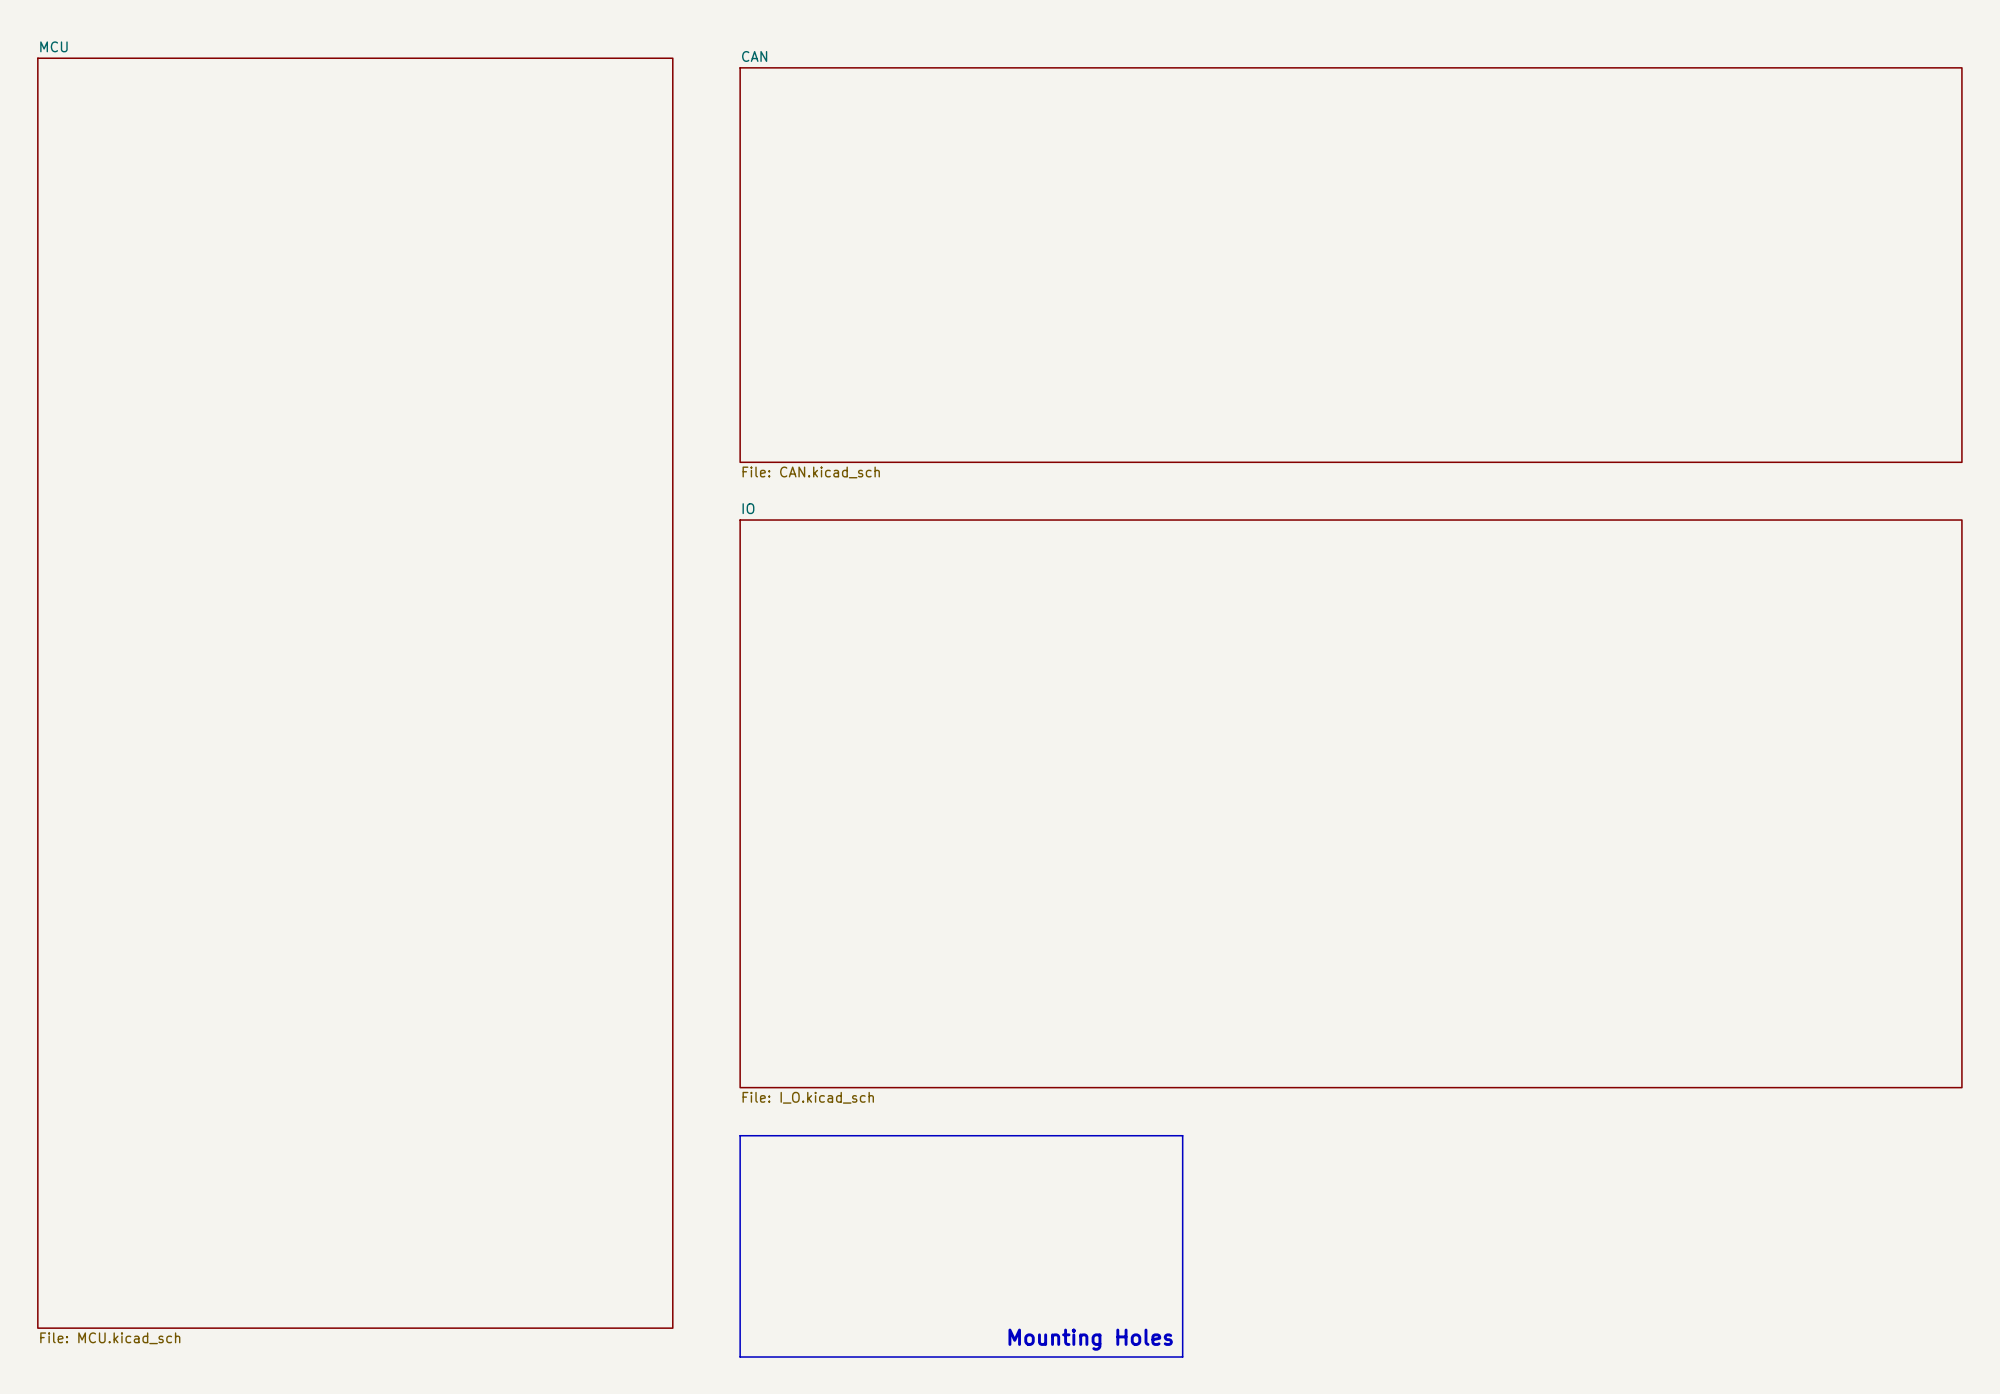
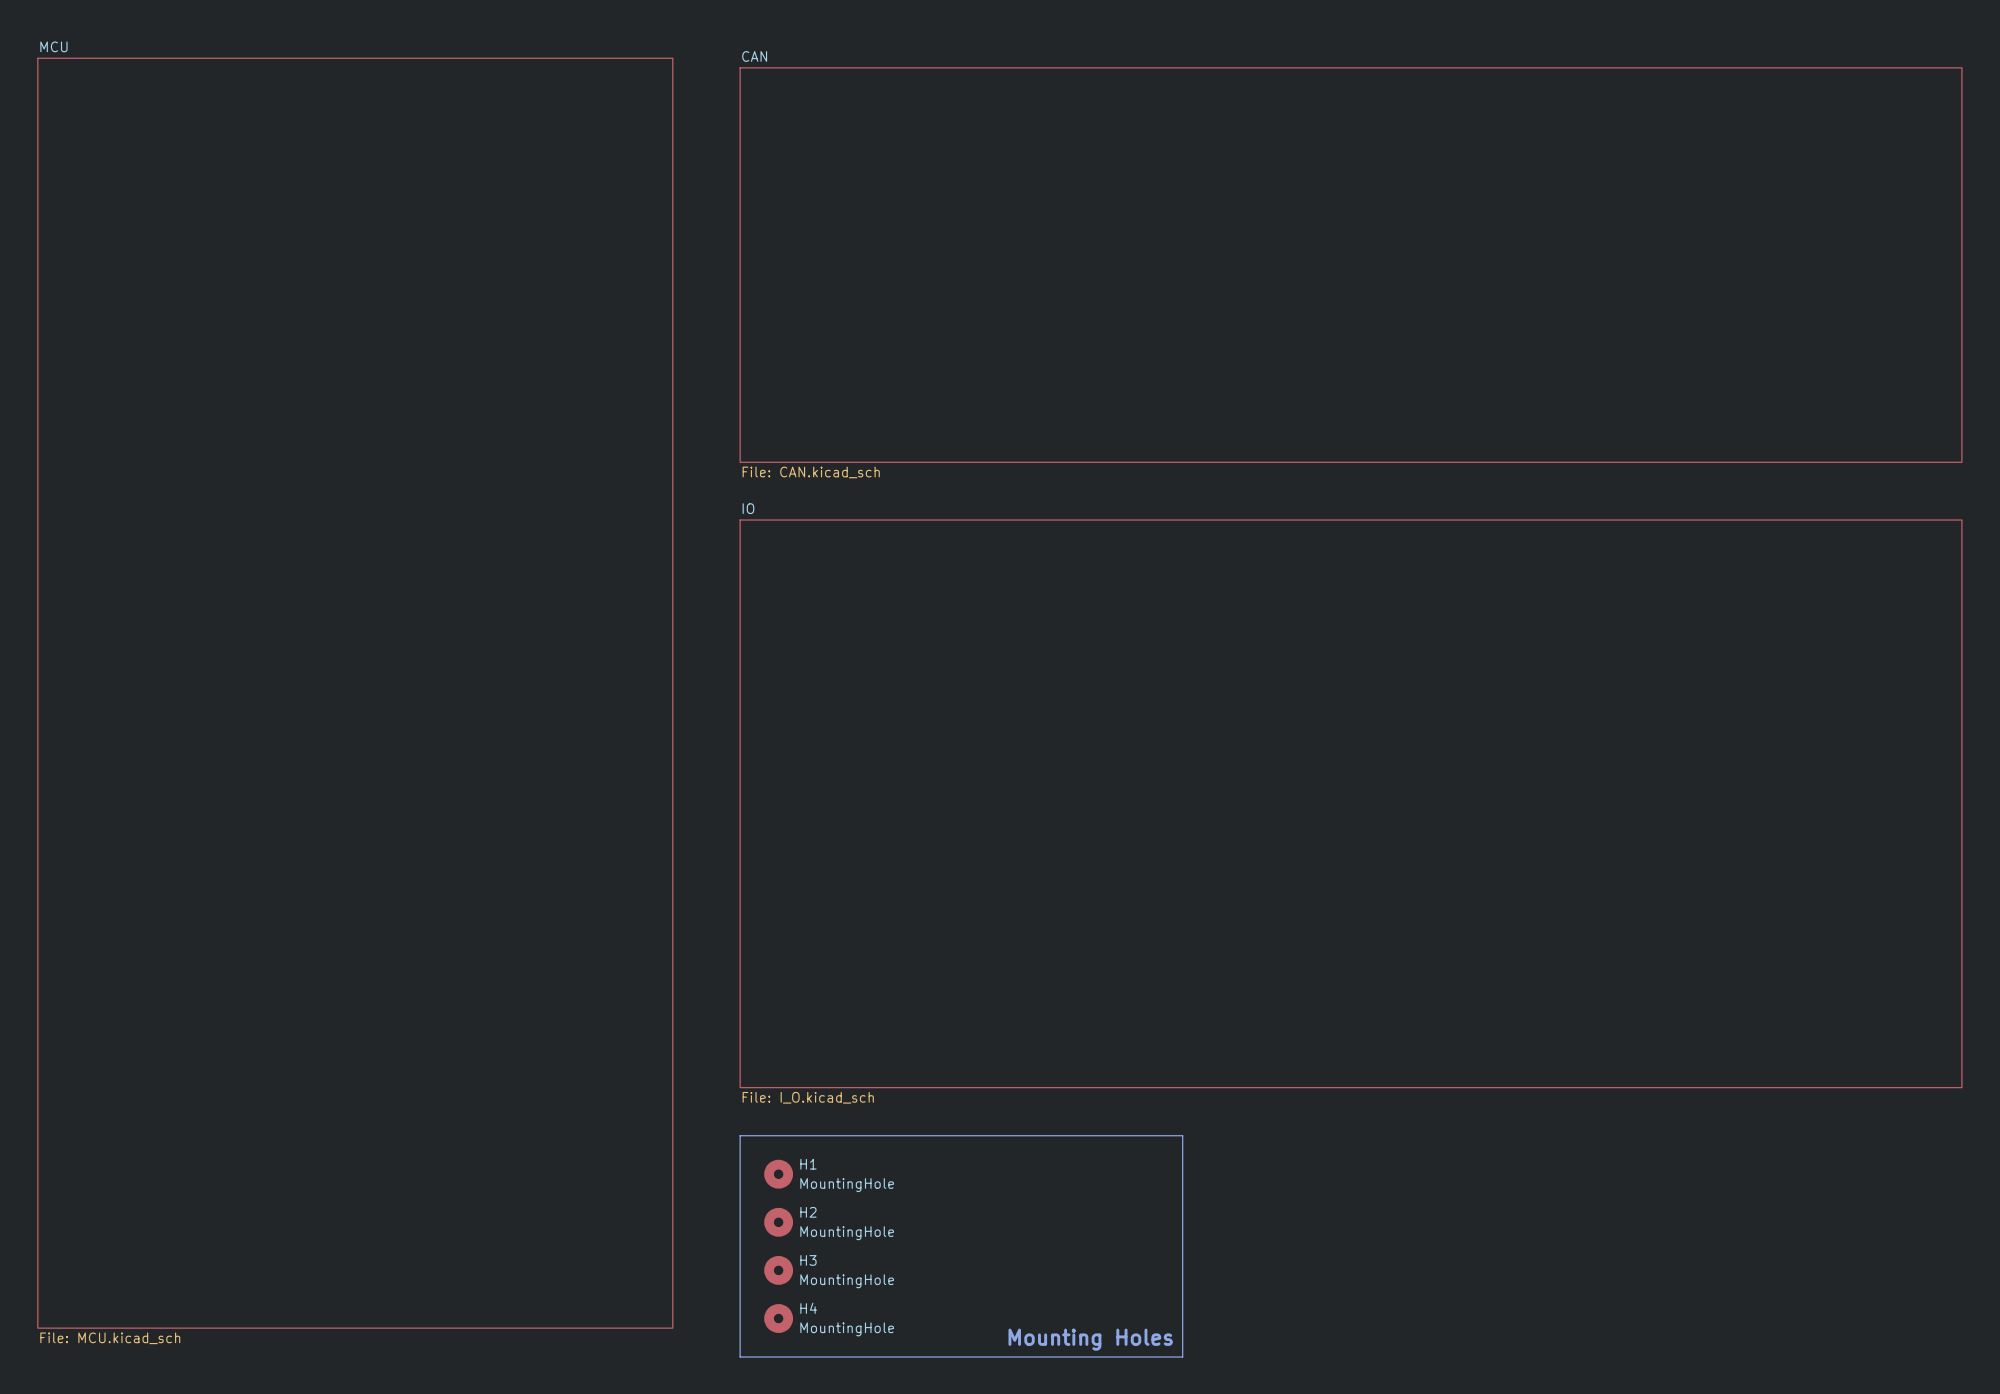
H1: none -> MountingHole (778, 1174)
H2: none -> MountingHole (778, 1222)
H3: none -> MountingHole (778, 1270)
H4: none -> MountingHole (778, 1318)

